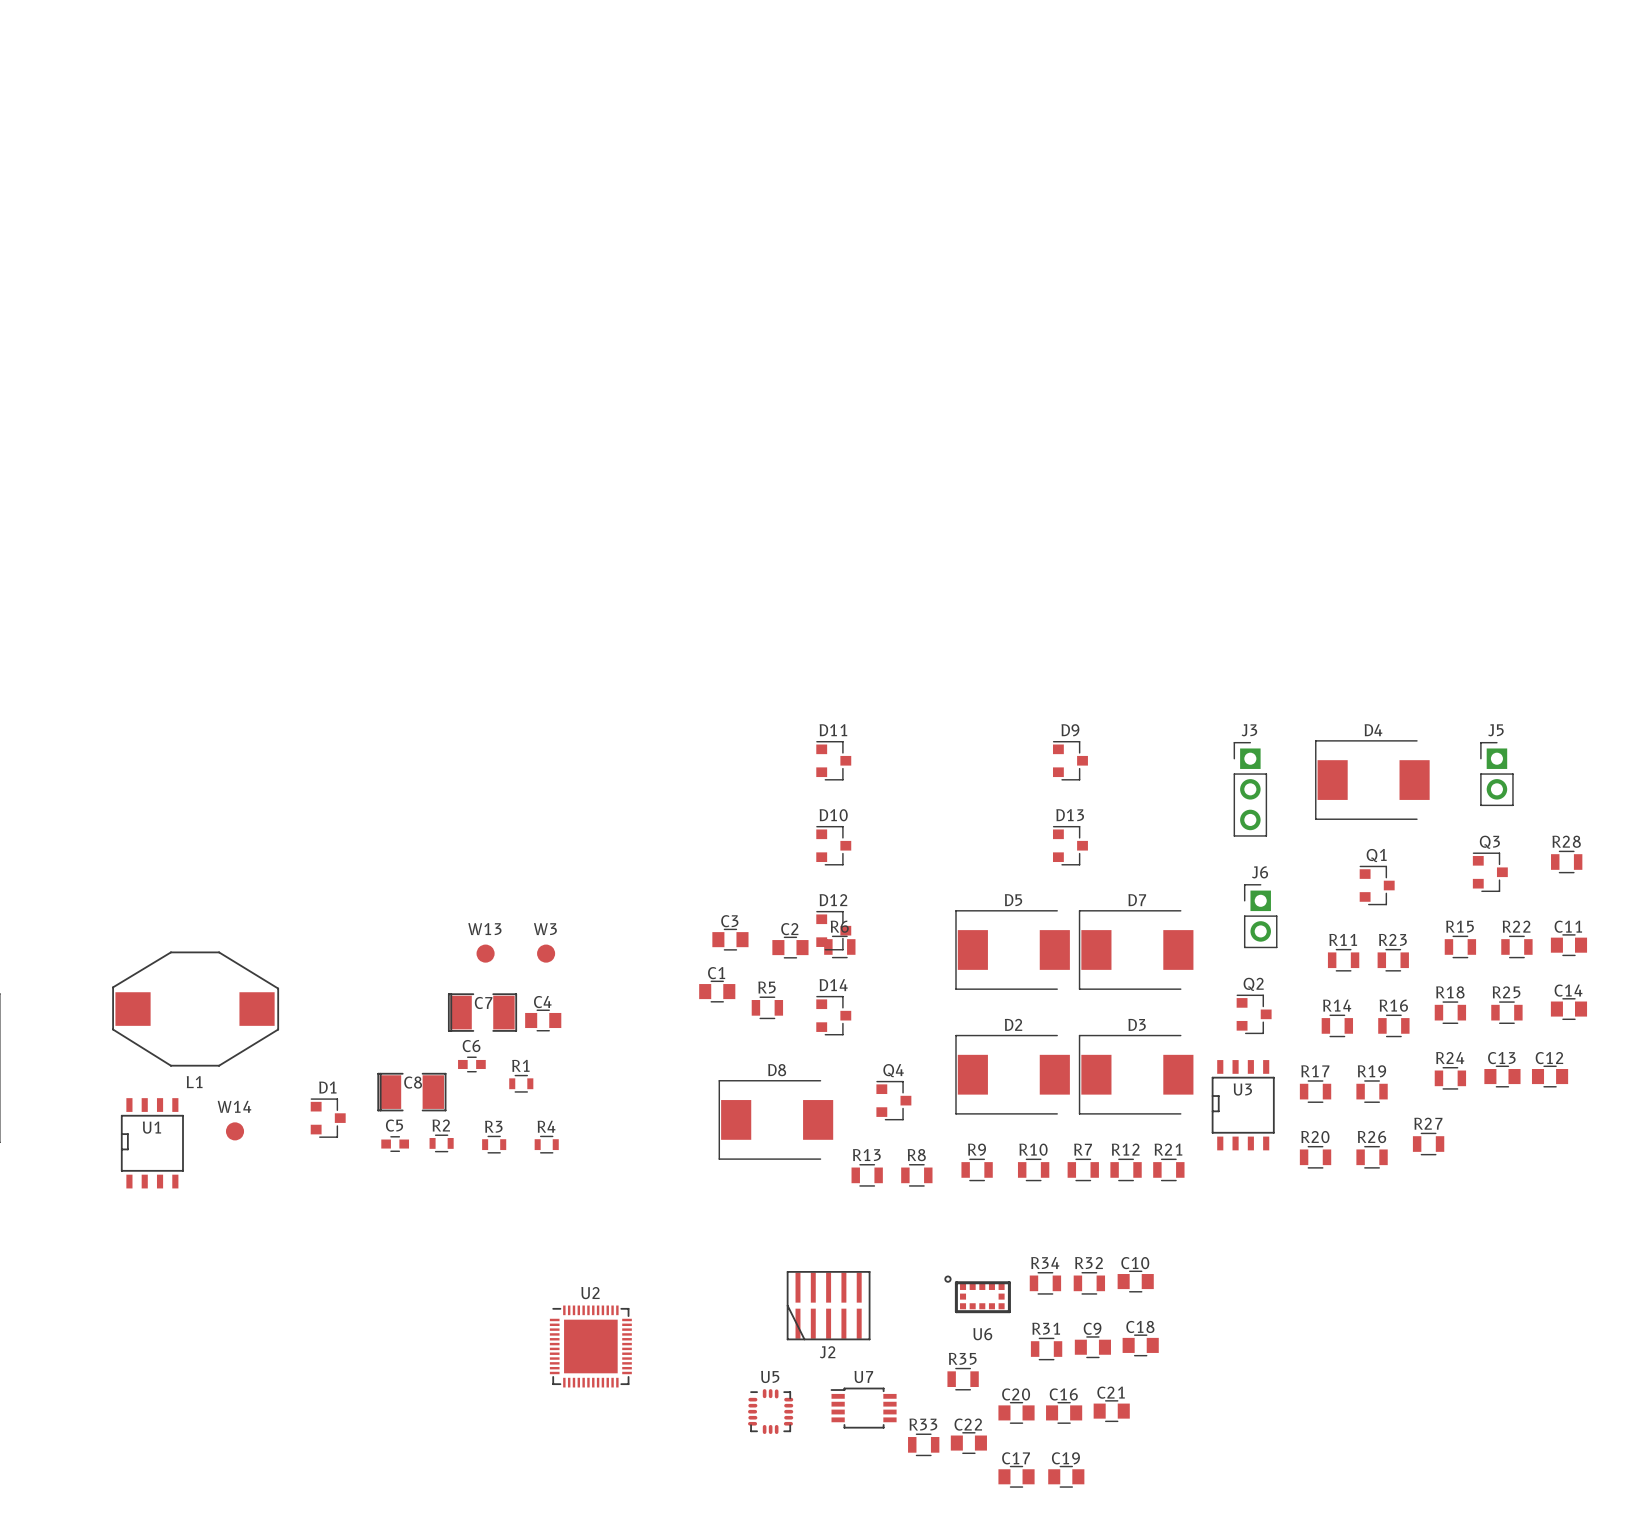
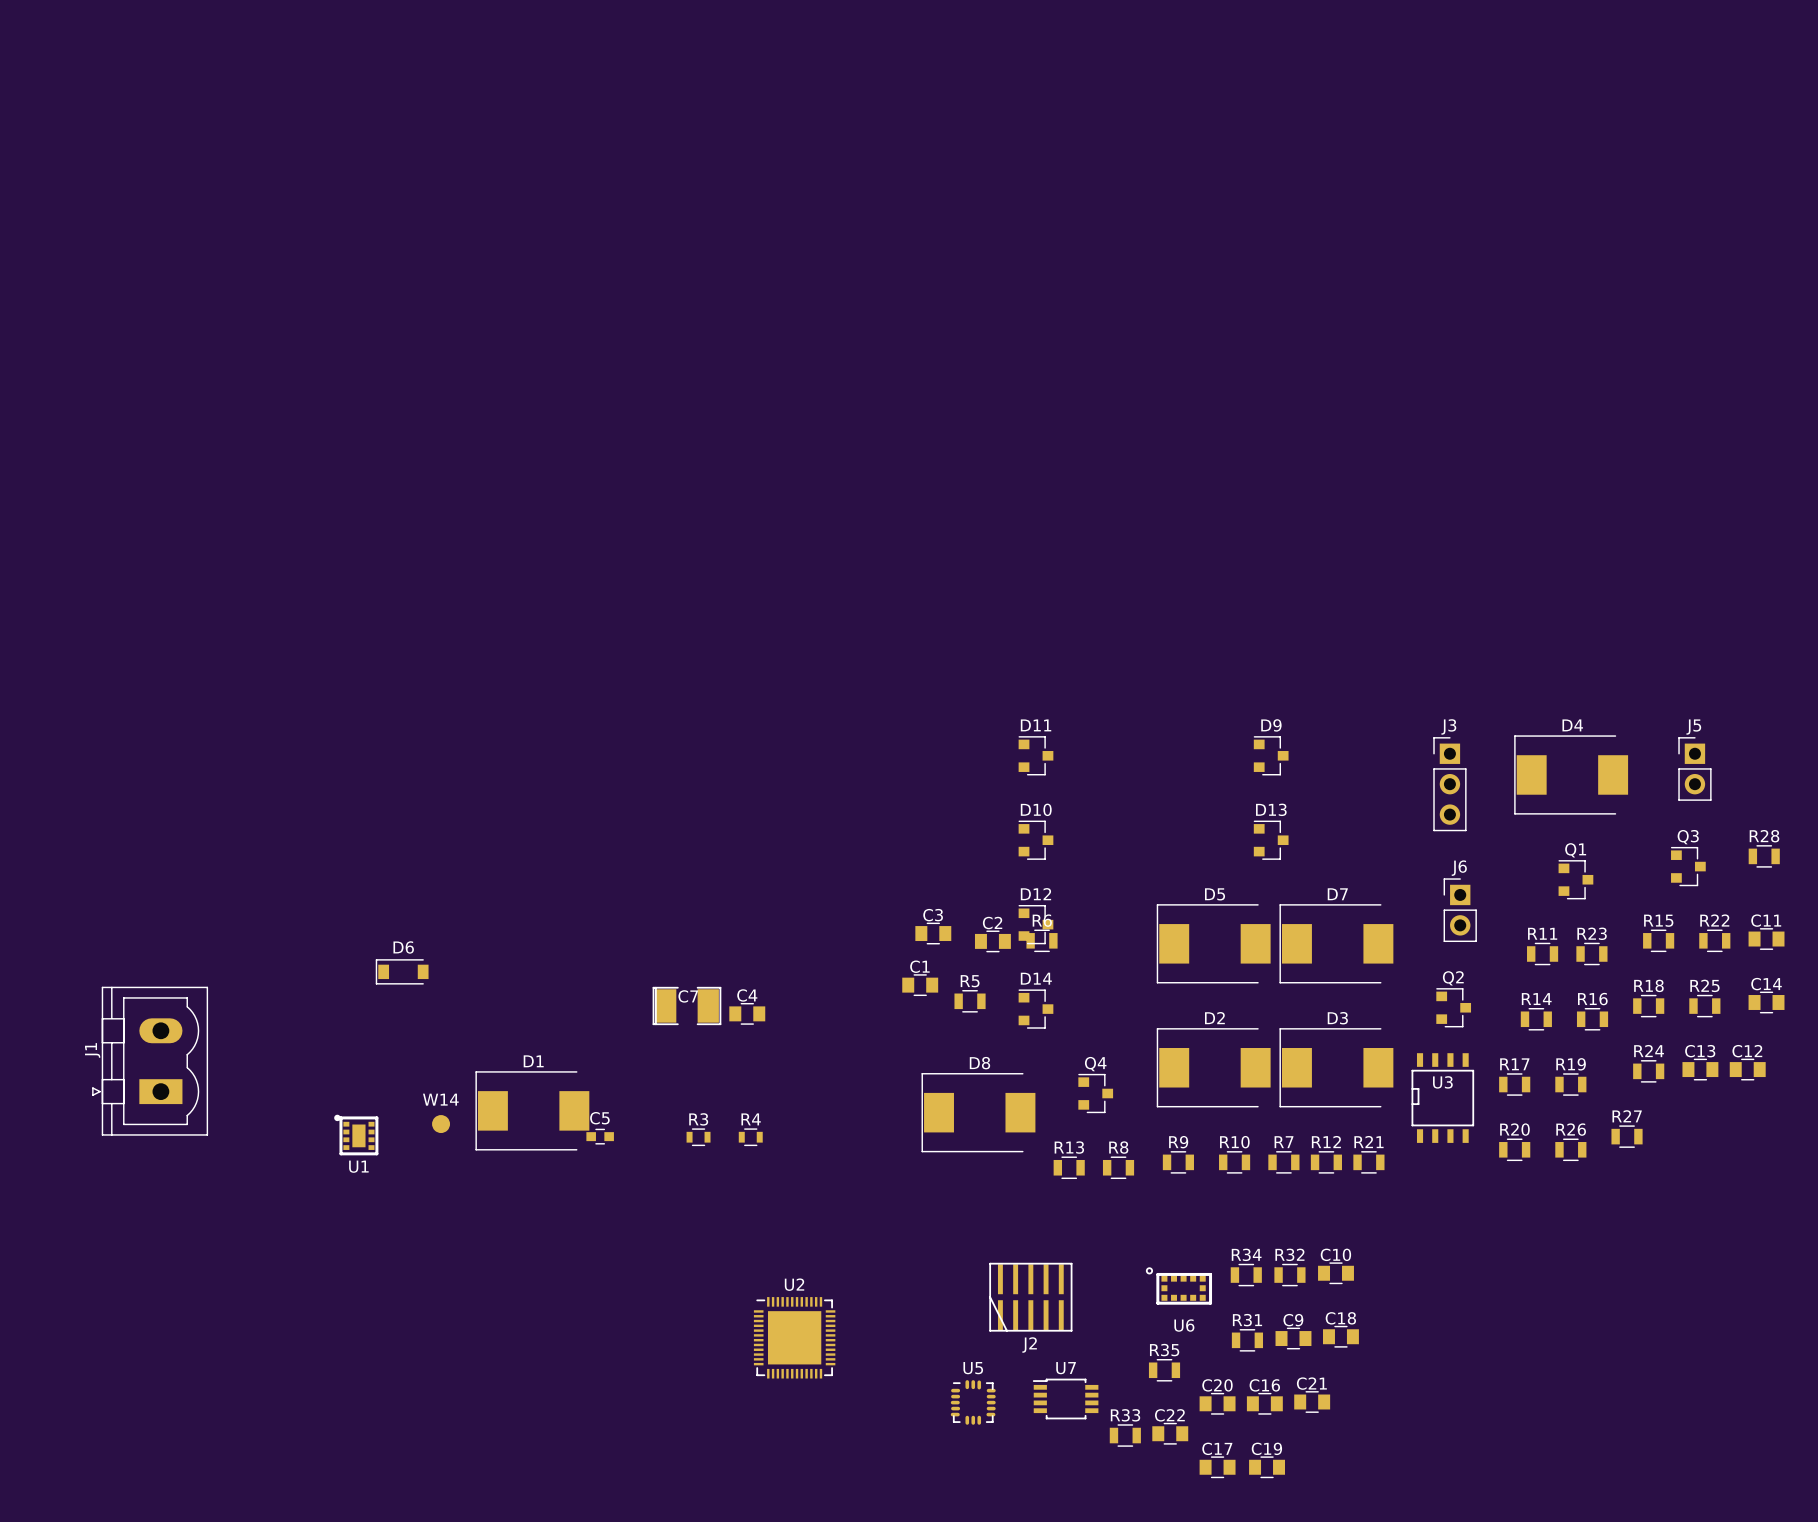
W13: (485, 953) -> none
W3: (546, 953) -> none
D6: none -> (402, 971)
L1: (195, 1009) -> none
C6: (471, 1064) -> none
R1: (521, 1083) -> none
C8: (411, 1092) -> none
U1 footprint: [120, 1098, 184, 1189] -> [334, 1114, 379, 1156]
D1 footprint: [310, 1098, 346, 1138] -> [475, 1071, 590, 1151]
U1 name position: U1 (151, 1127) -> U1 (358, 1166)
R2: (441, 1143) -> none

